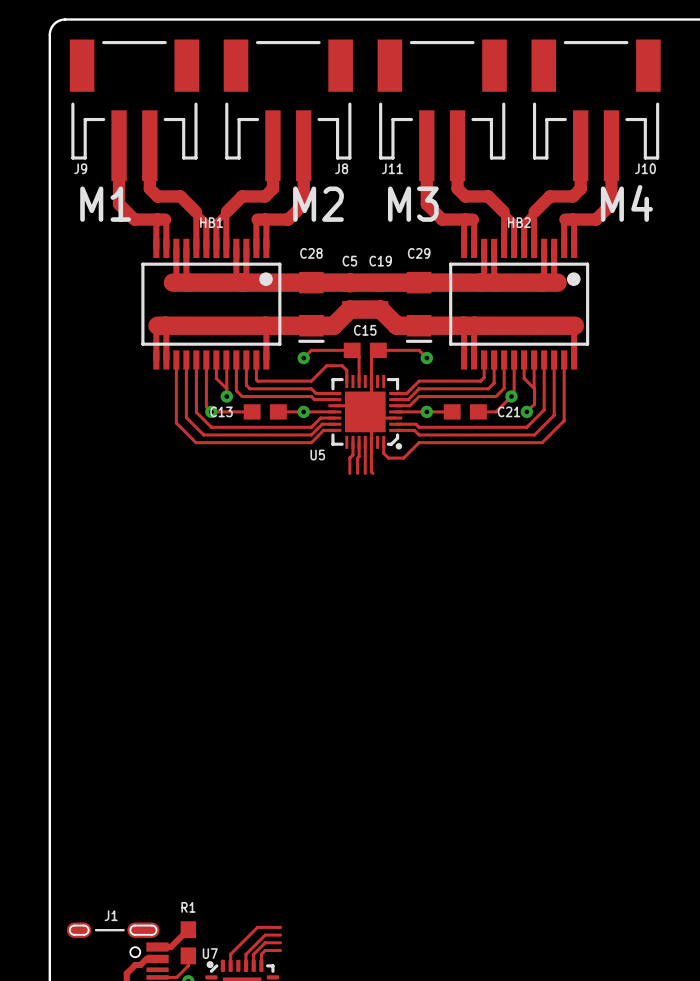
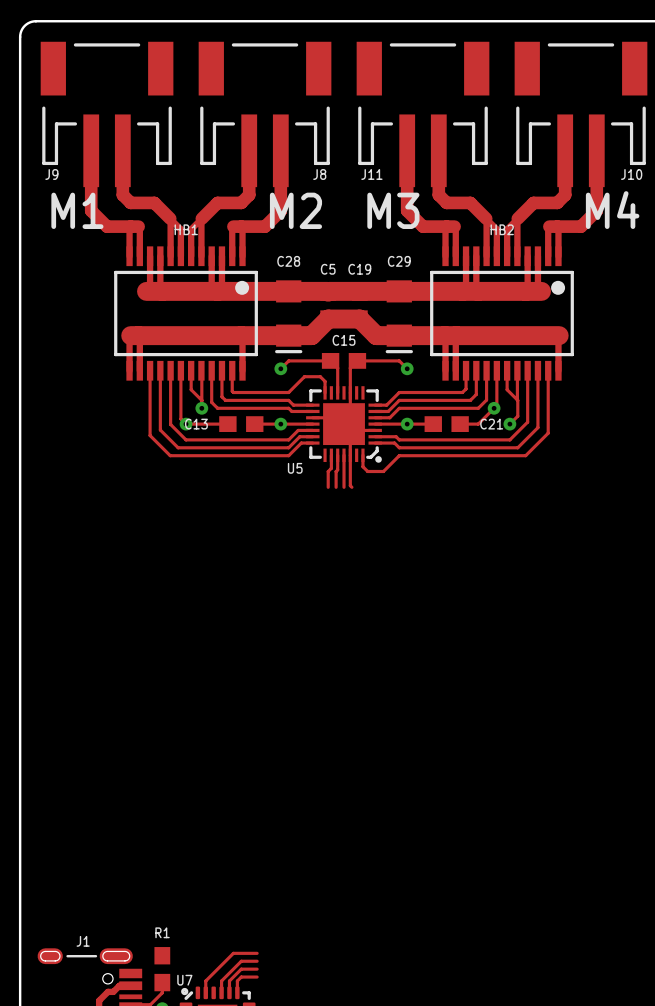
track: (188, 929) (170, 947) (157, 947) -> none

